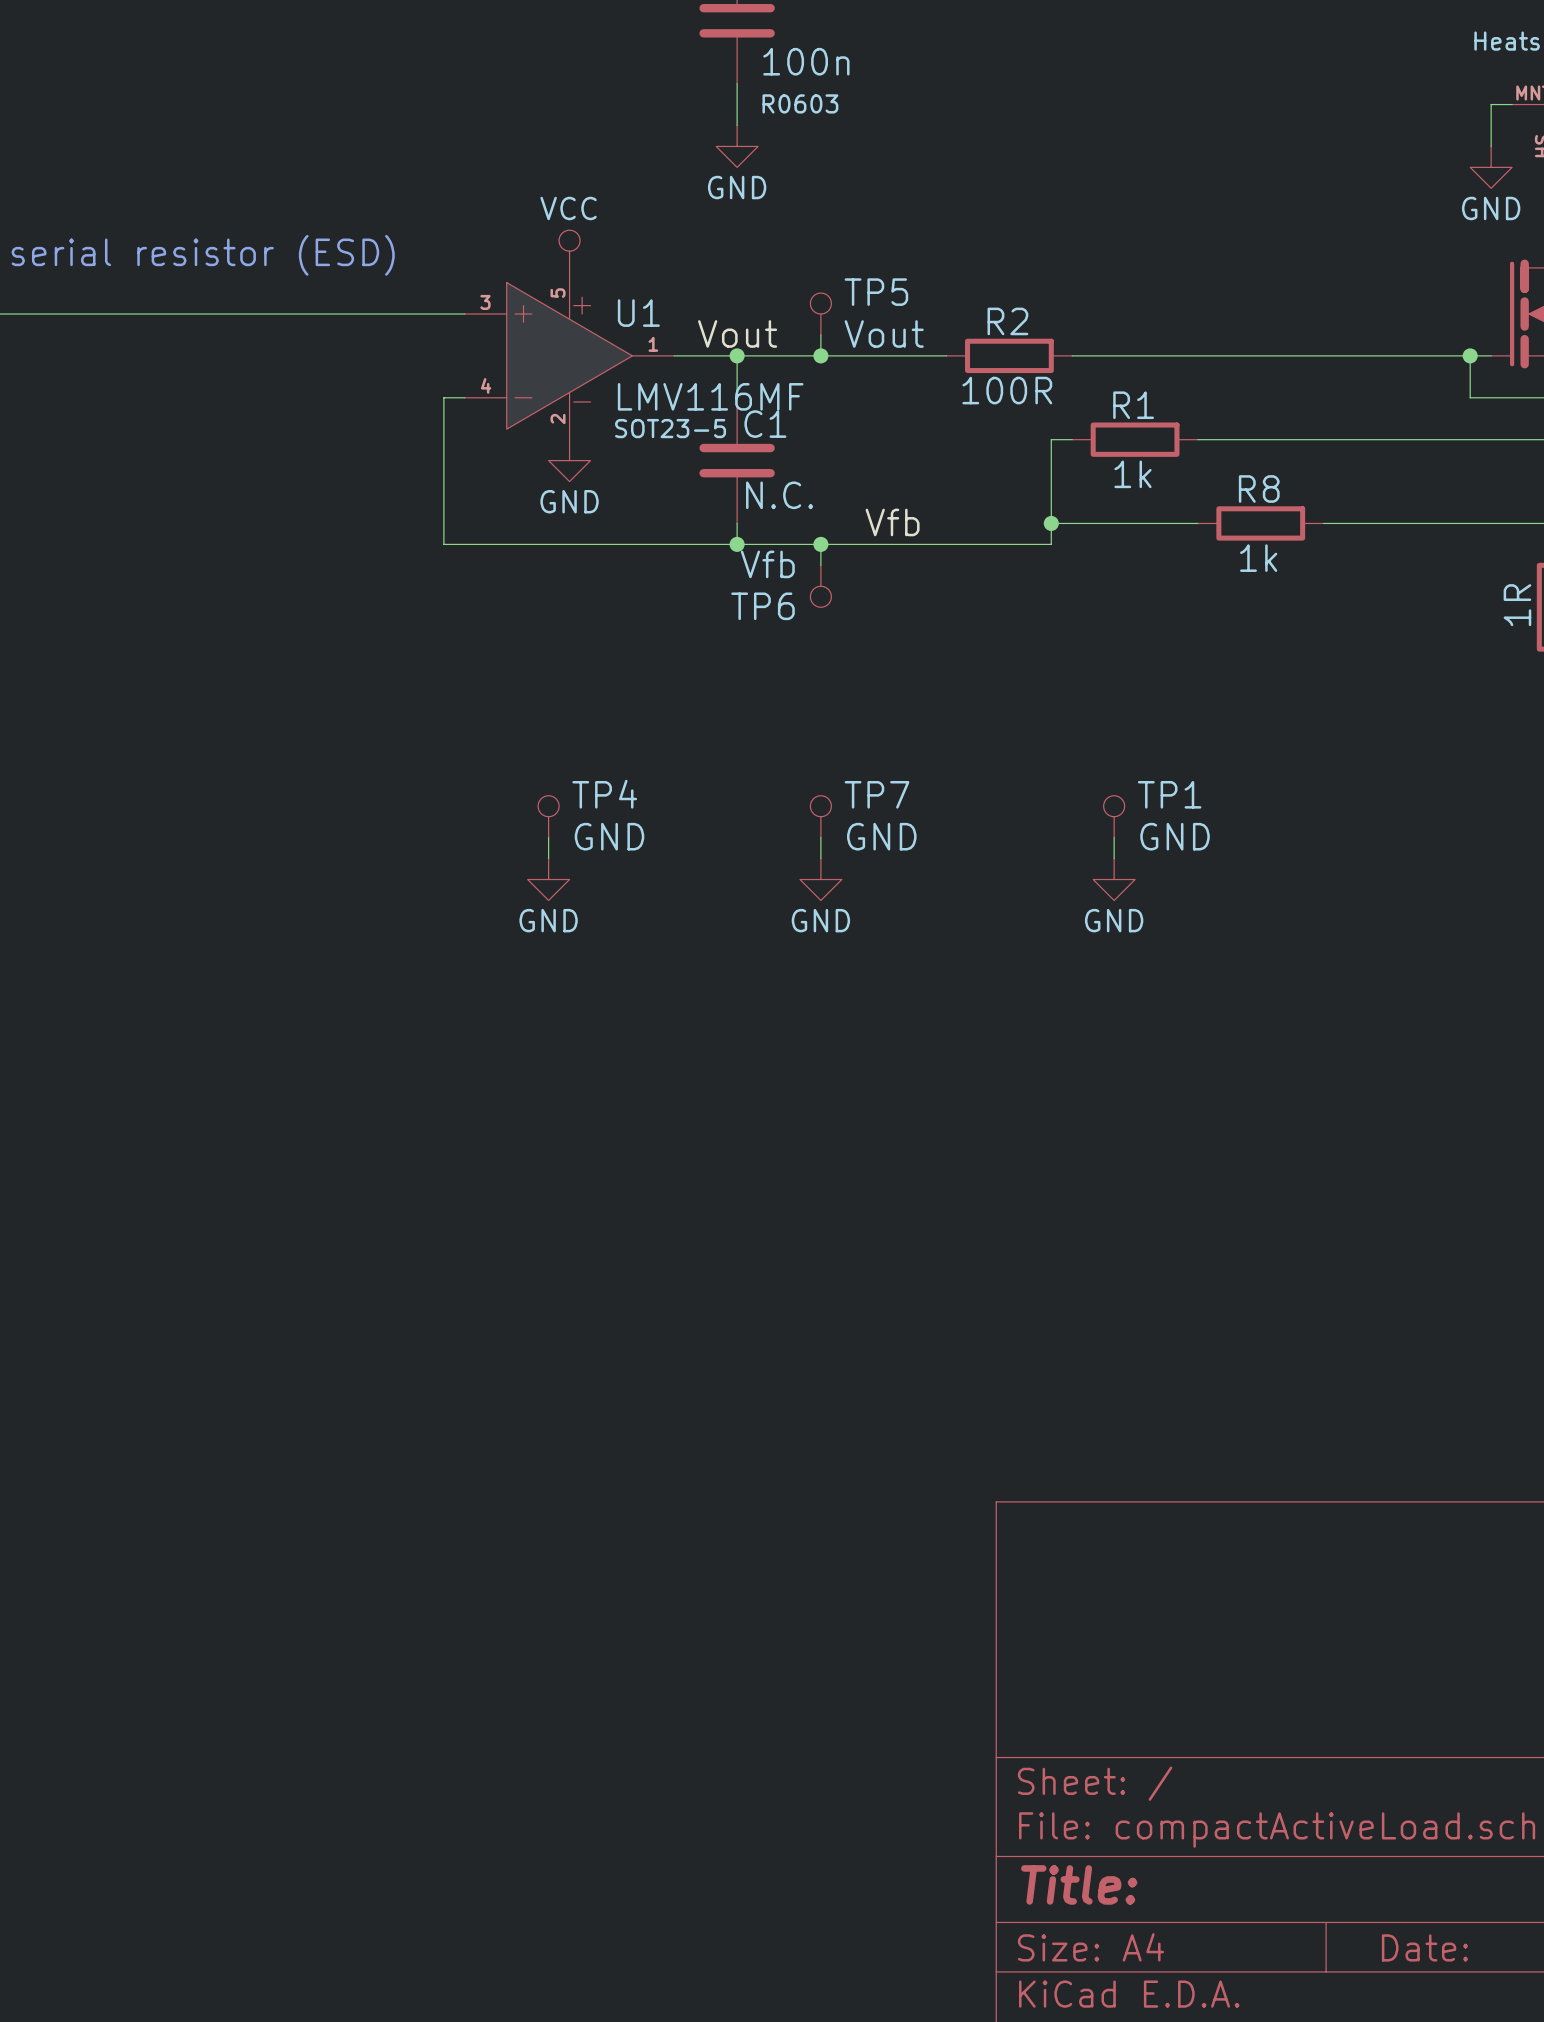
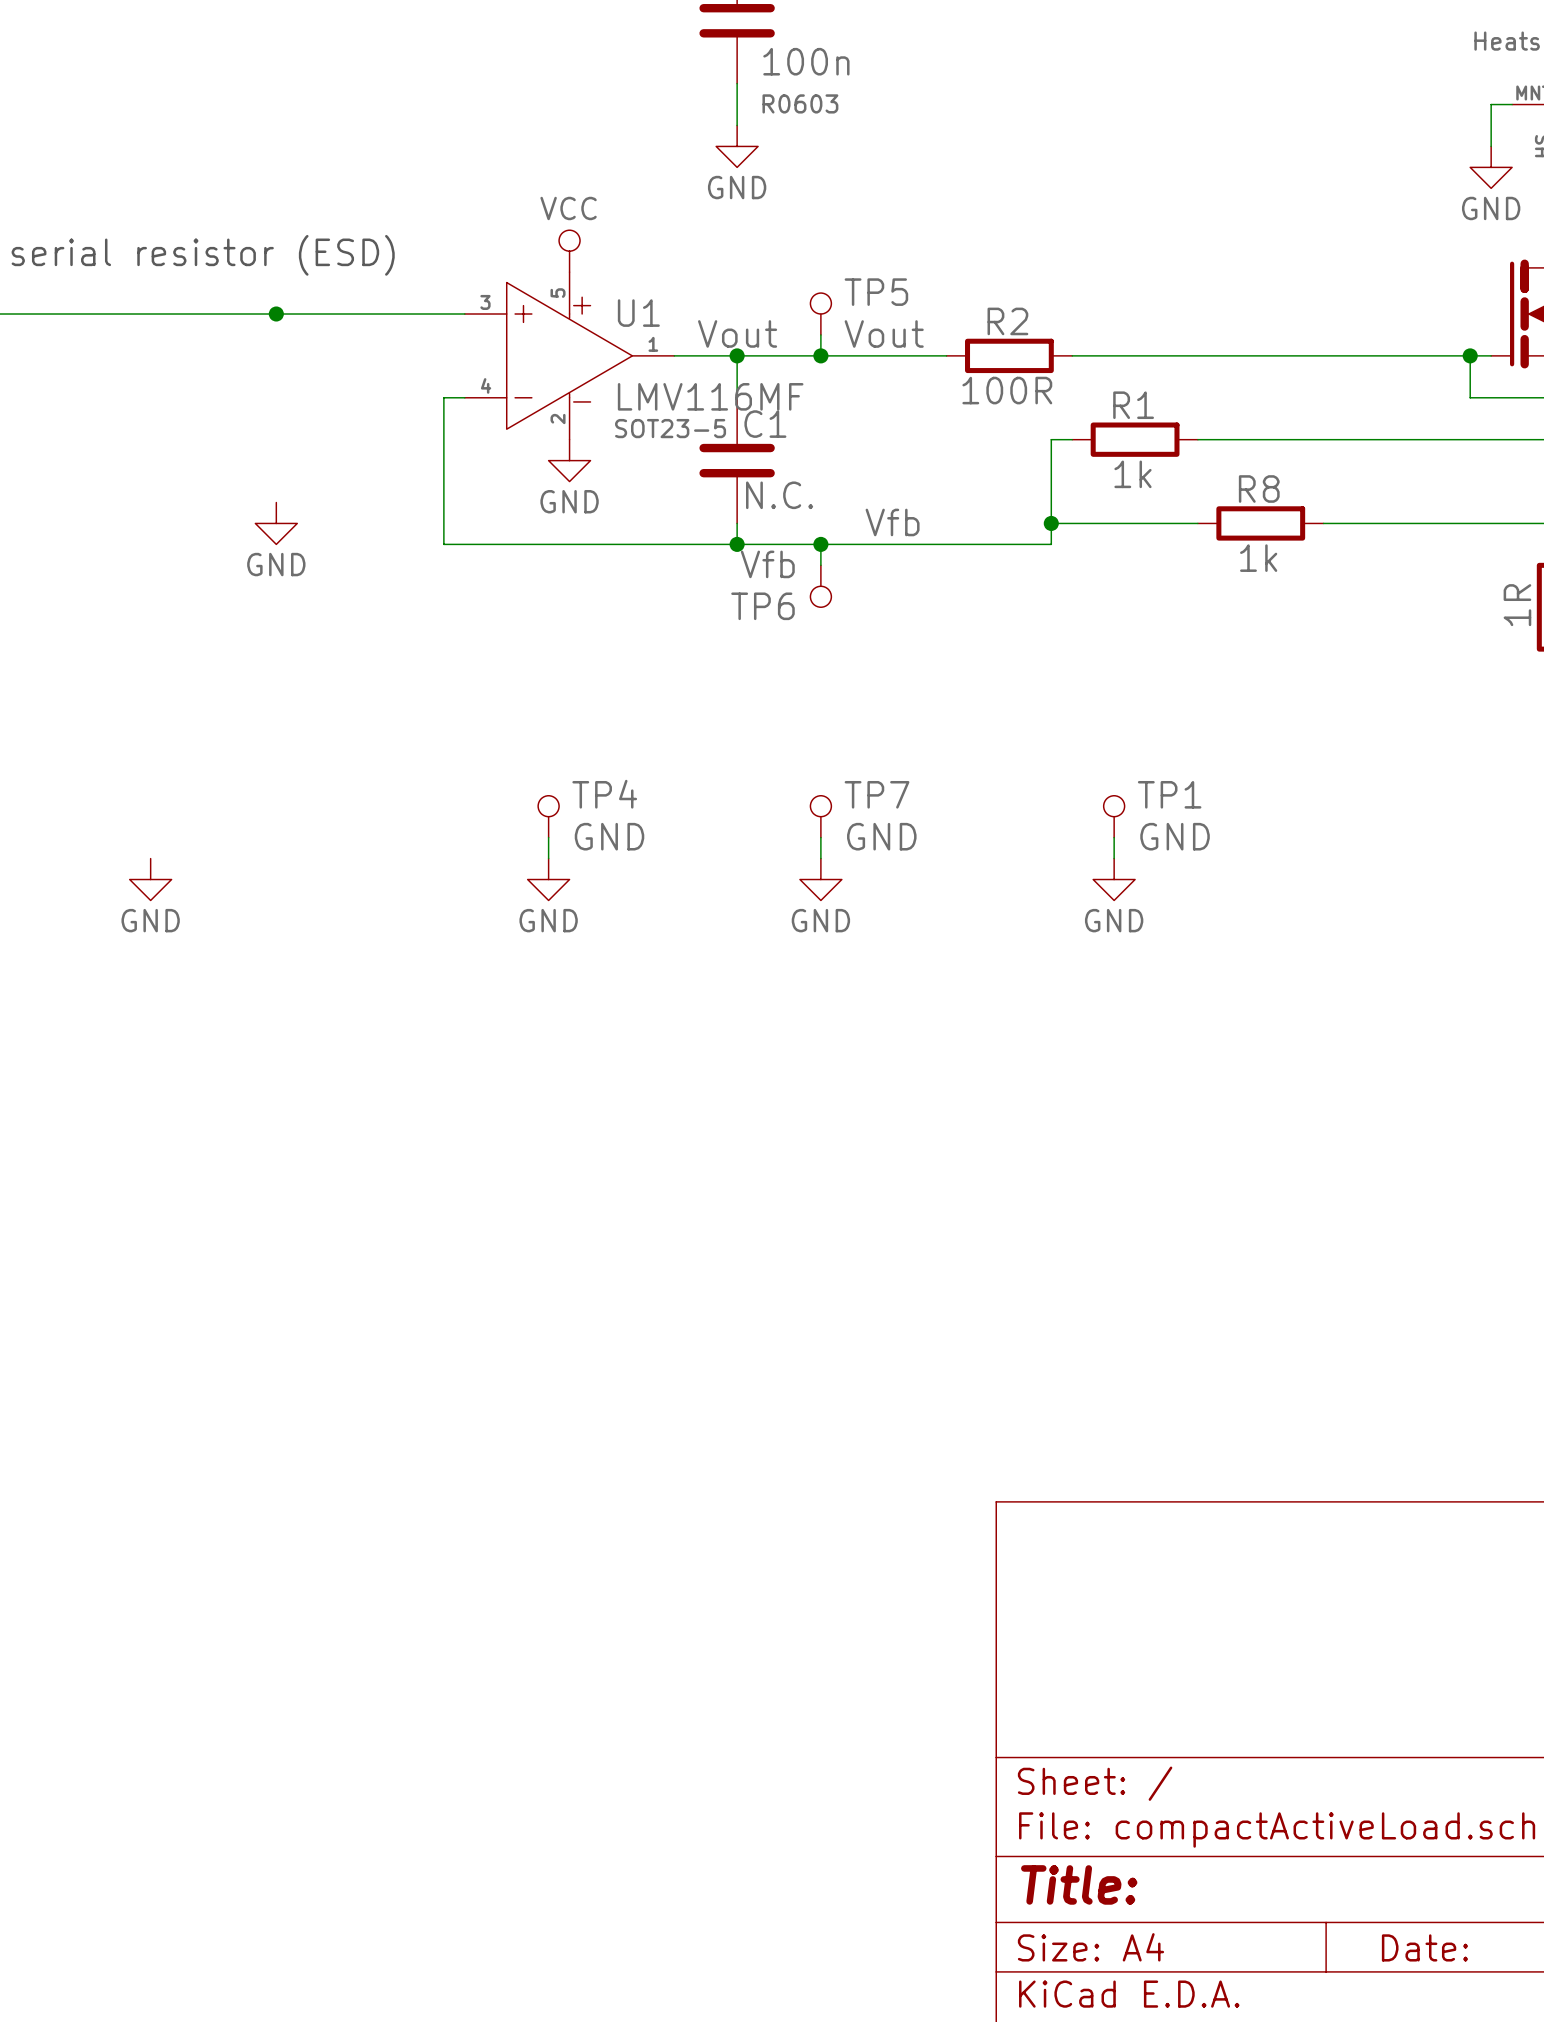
junction: none -> (276, 314)
power symbol: none -> GND (276, 523)
power symbol: none -> GND (150, 879)

